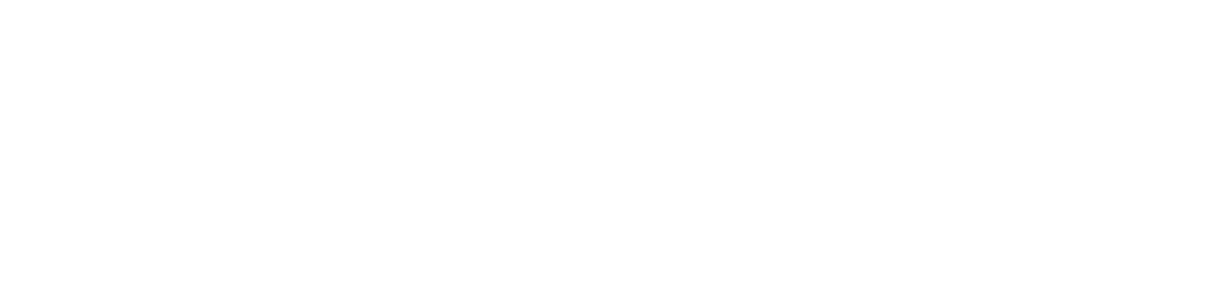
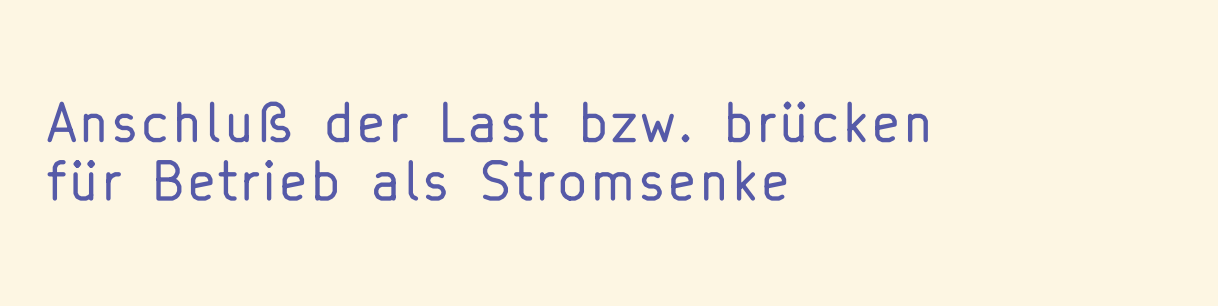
text: none -> Anschluß der Last bzw. brücken (487, 121)
text: none -> für Betrieb als Stromsenke (416, 180)

